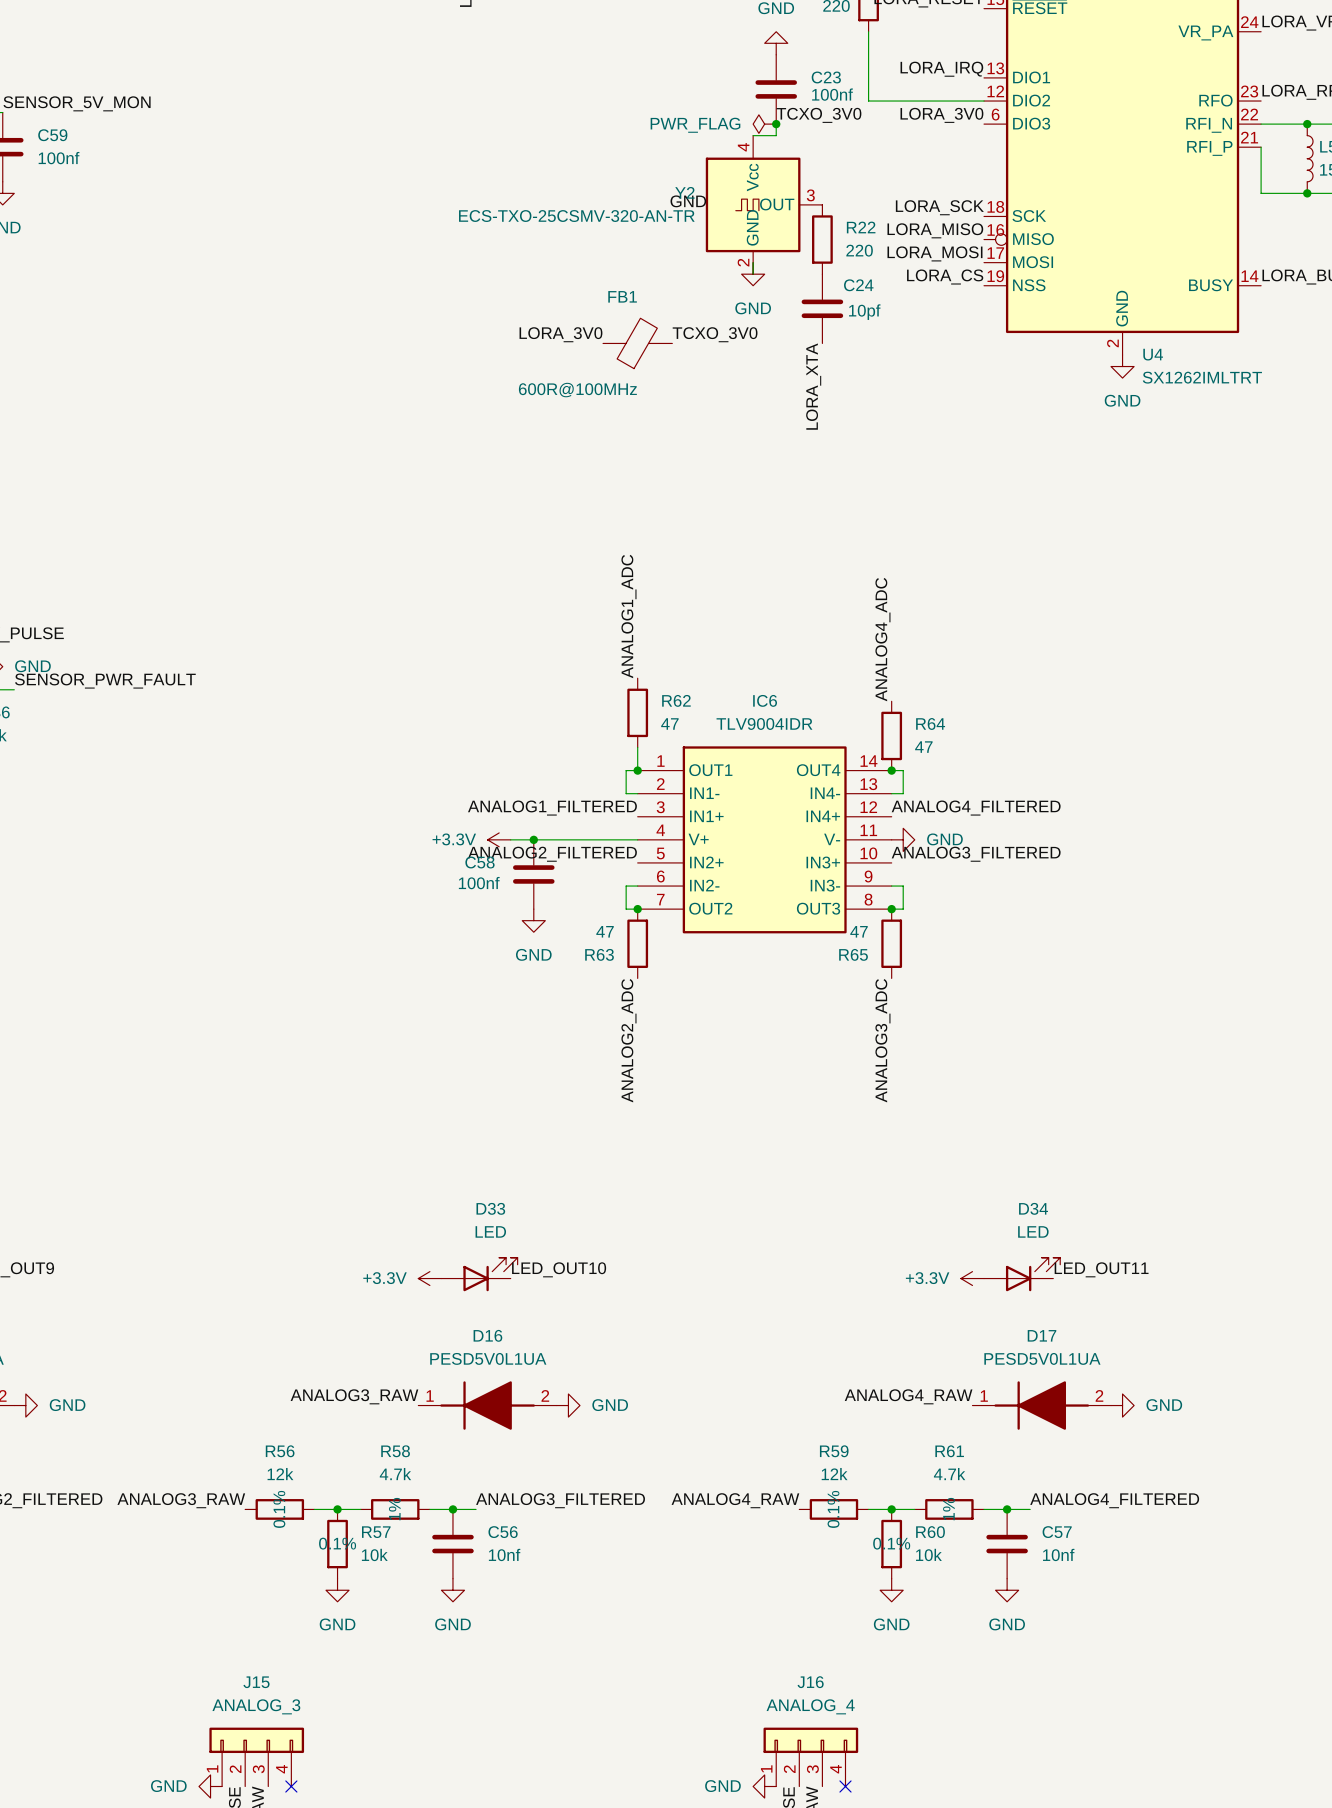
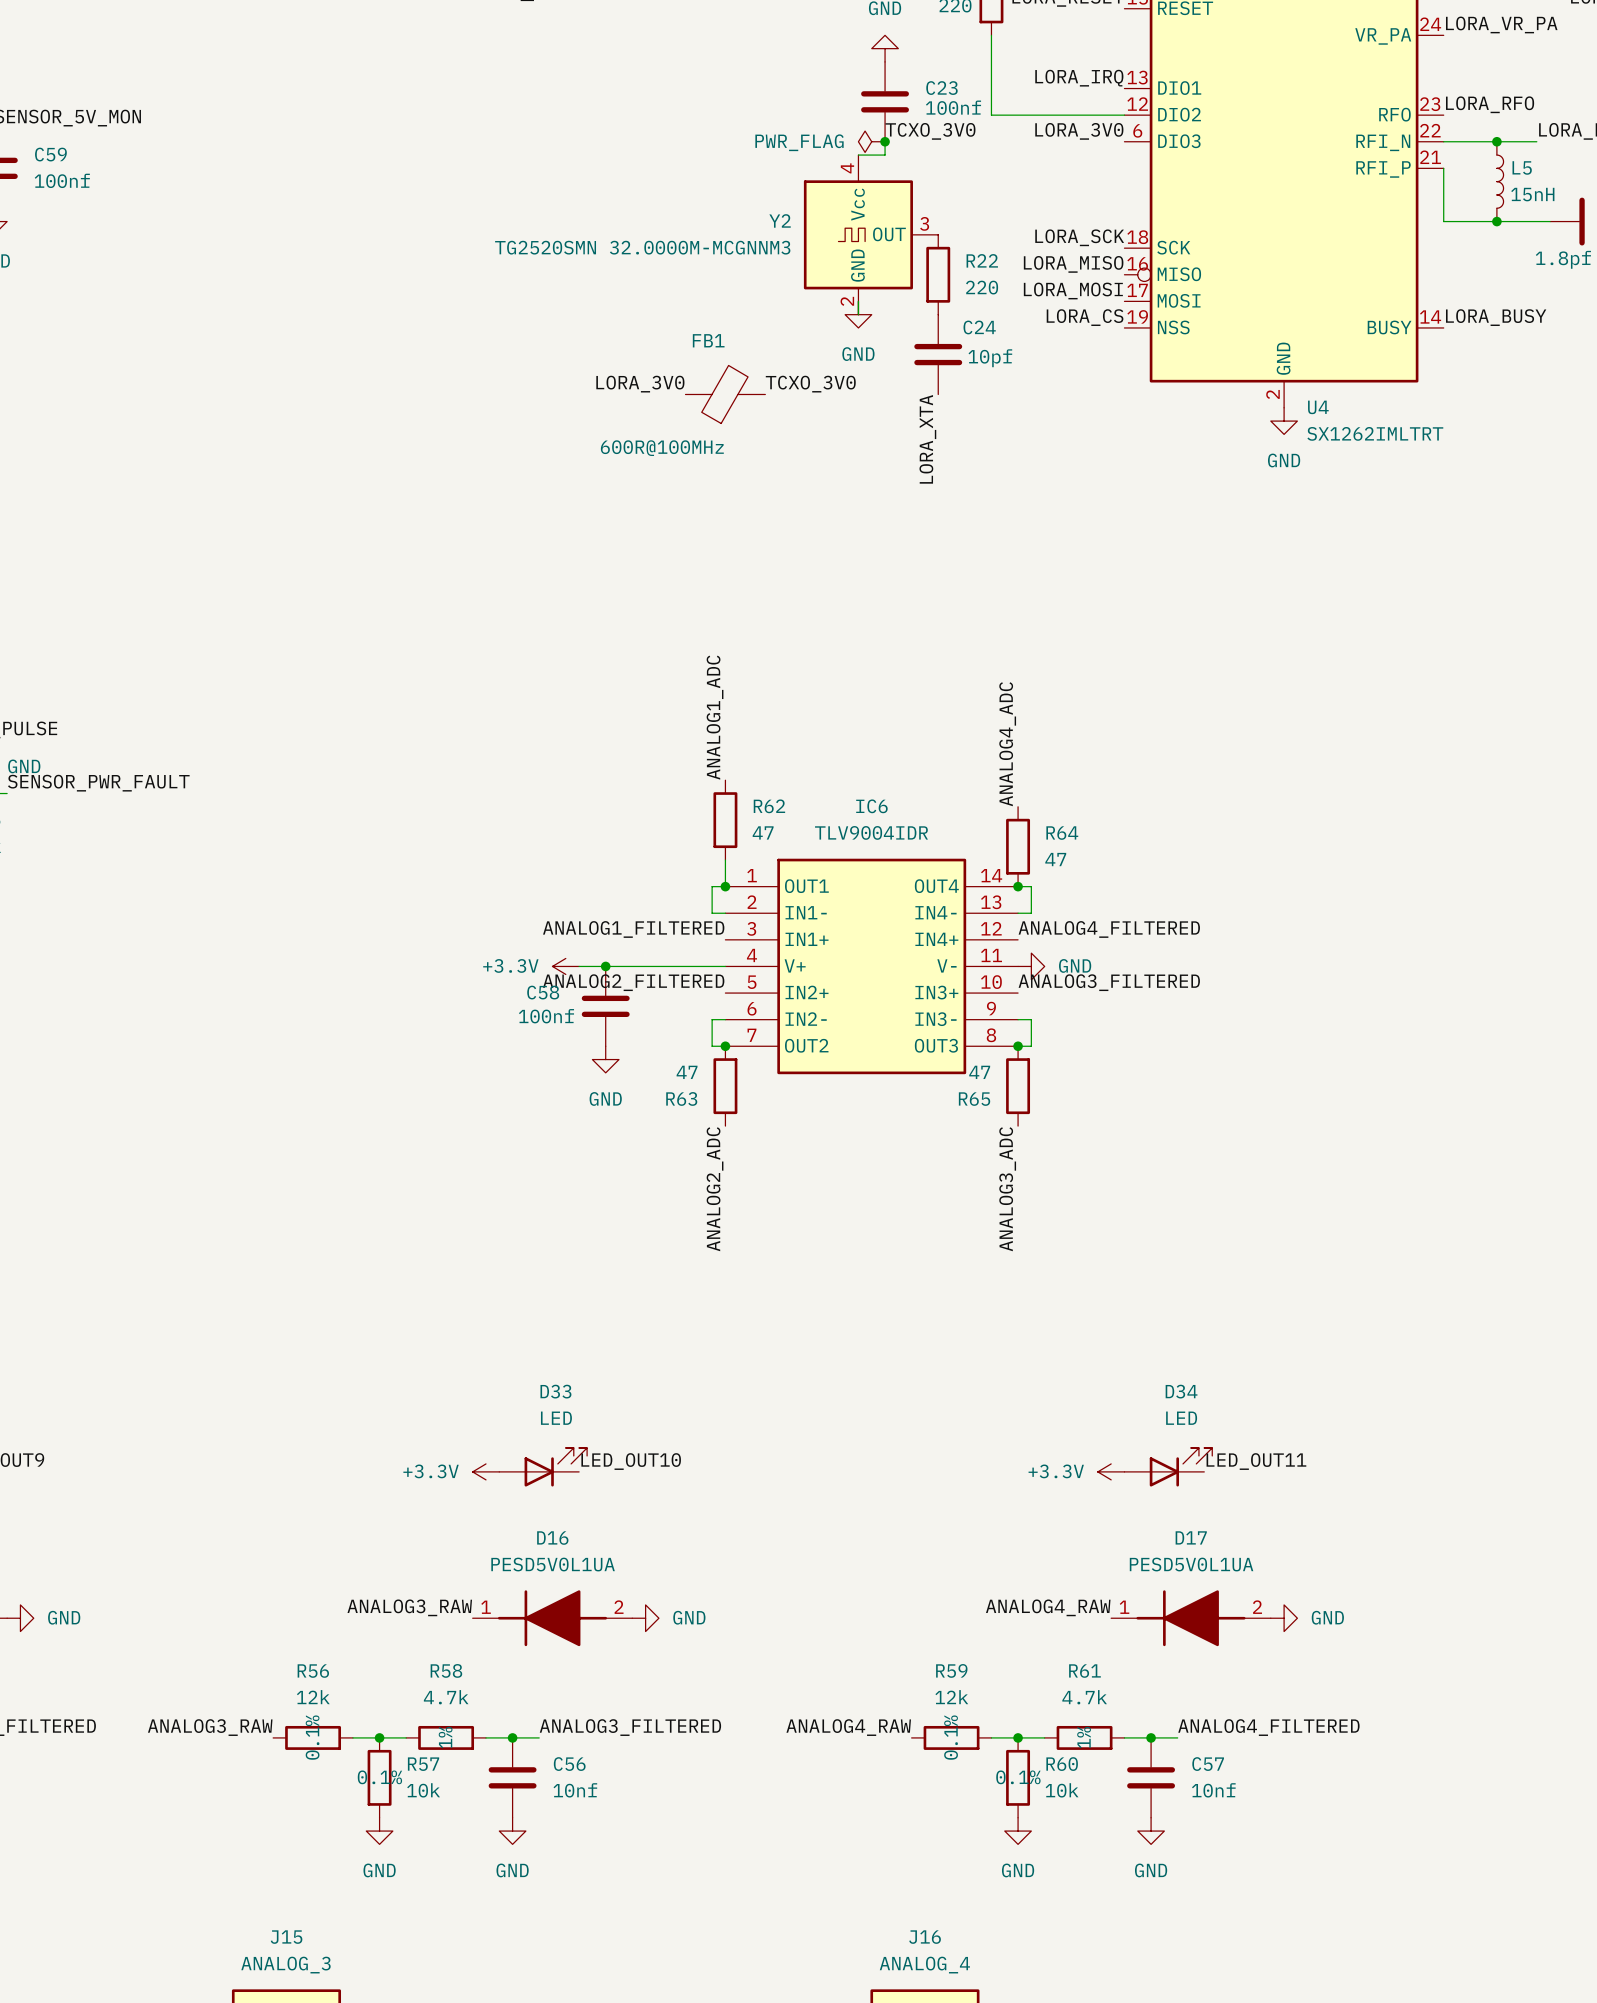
label: GND (688, 201) -> none
Y2 value: ECS-TXO-25CSMV-320-AN-TR (576, 216) -> TG2520SMN 32.0000M-MCGNNM3 (642, 247)

